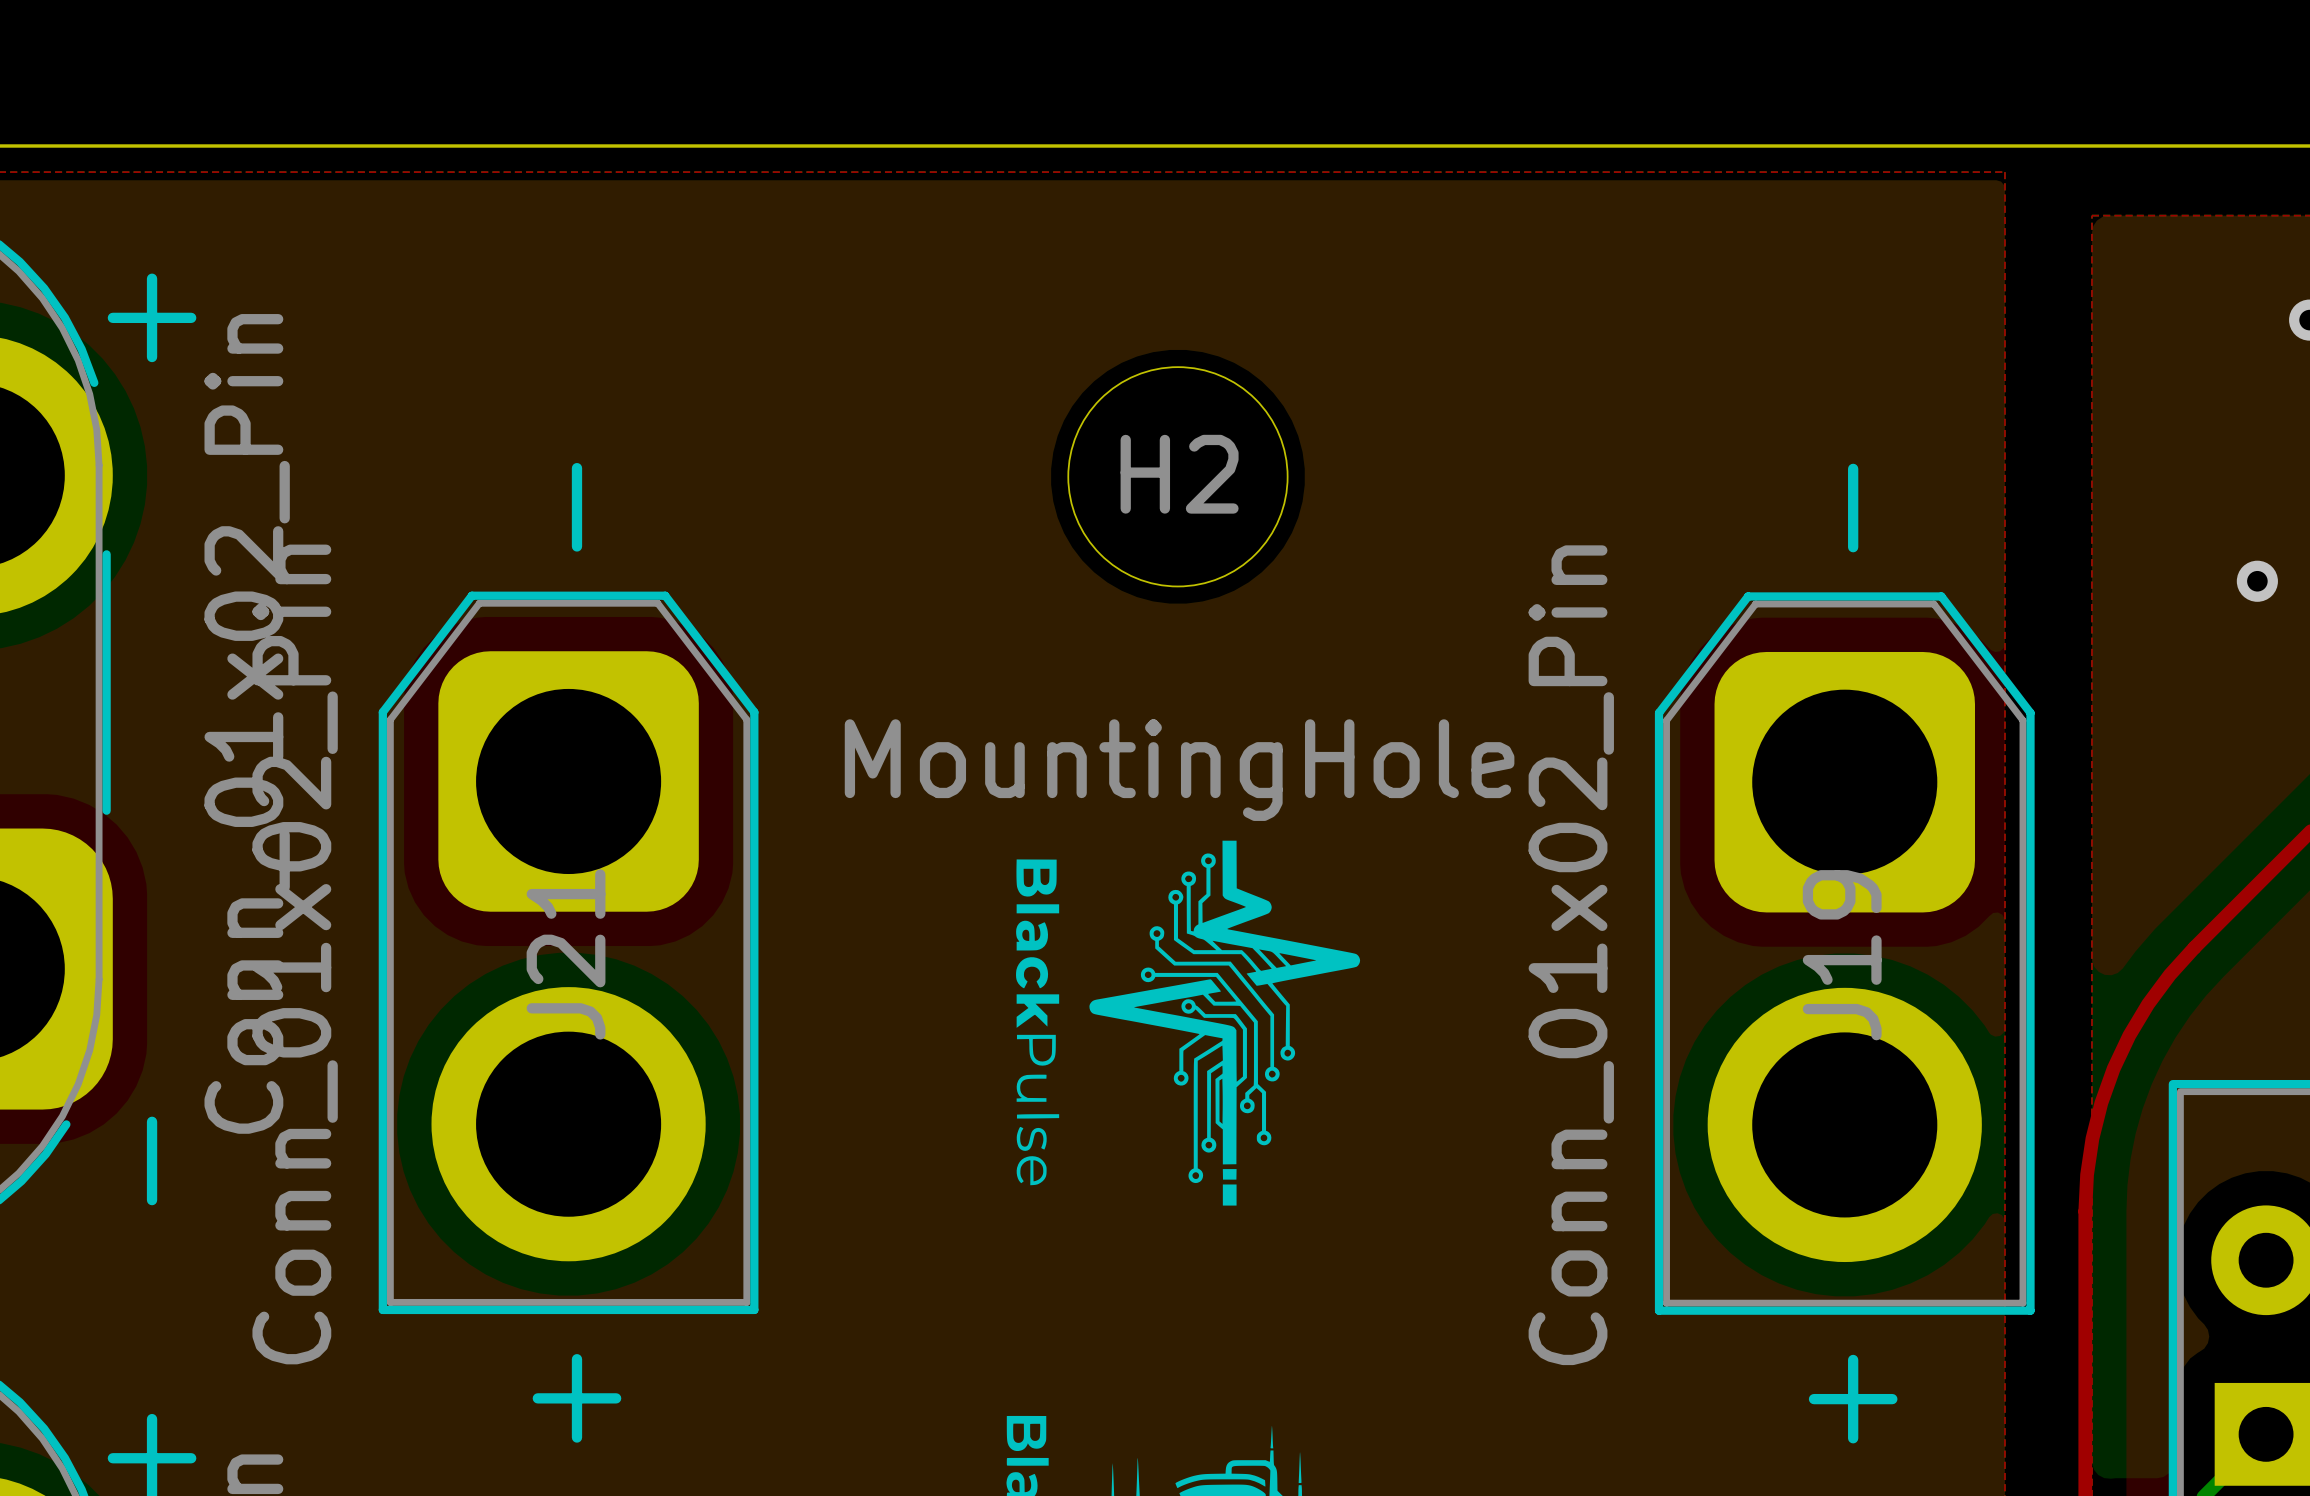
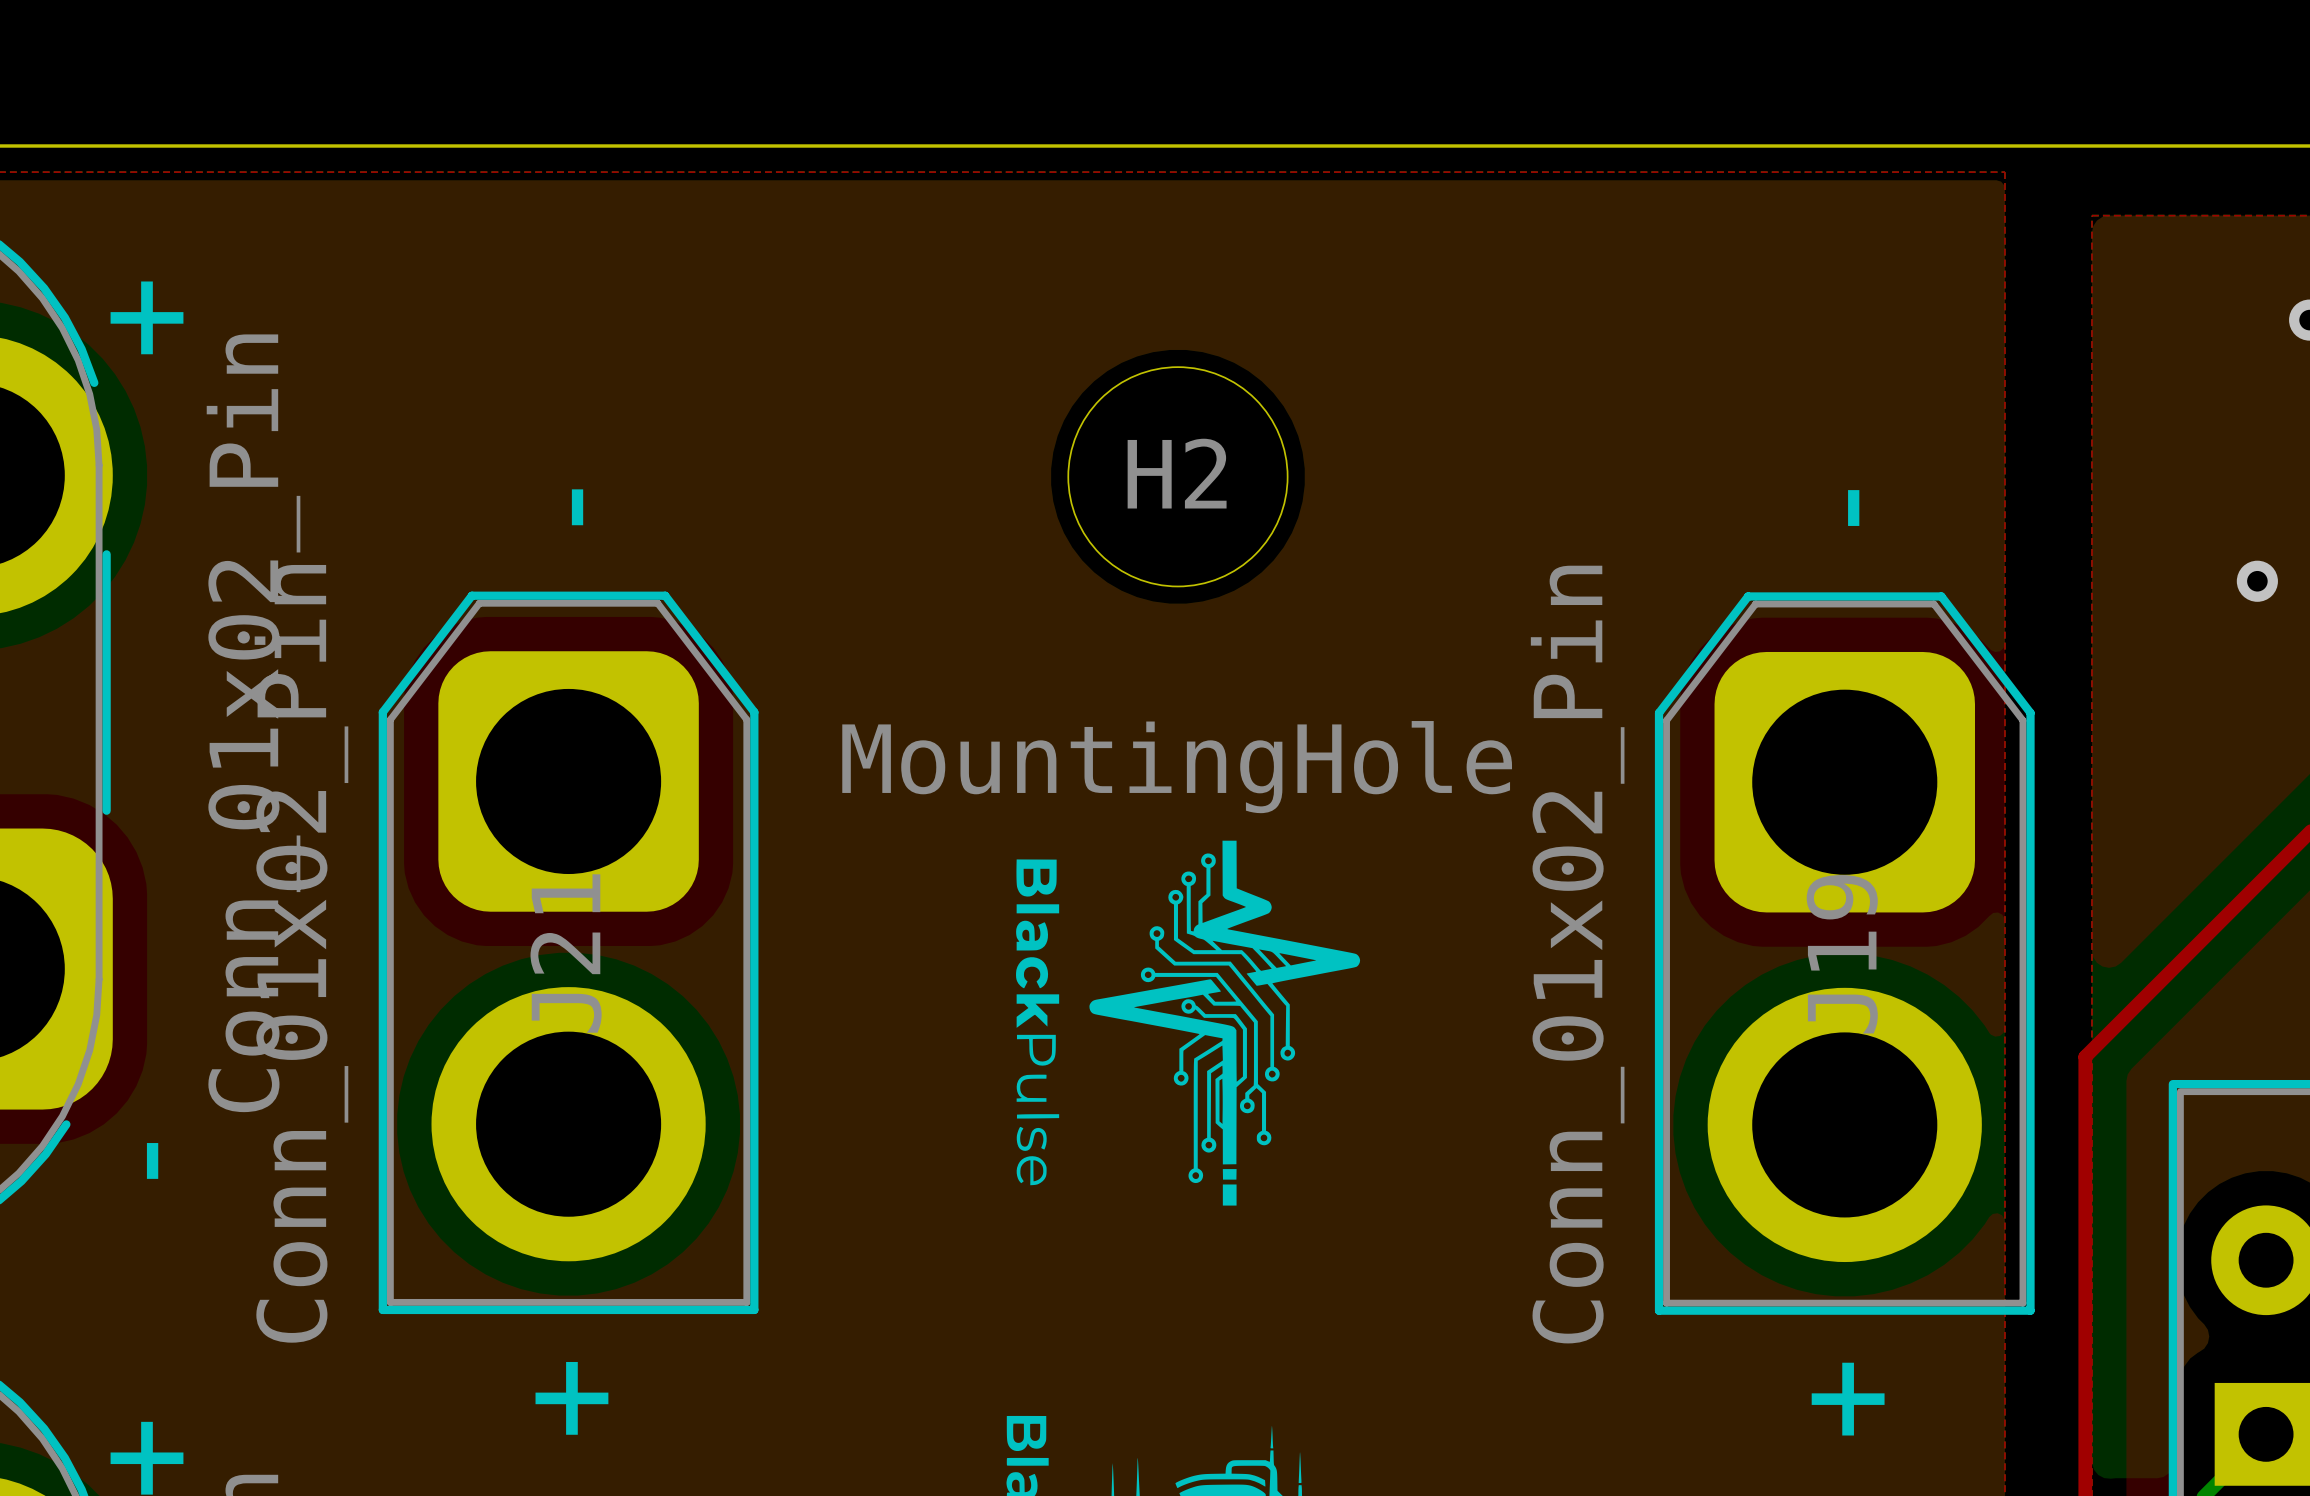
top track: (2194, 947) (2169, 974) (2148, 1004) (2129, 1035) (2113, 1068) (2101, 1103) (2092, 1138) (2087, 1174) (2085, 1211) -> (2194, 947) (2085, 1056) (2085, 1211)

